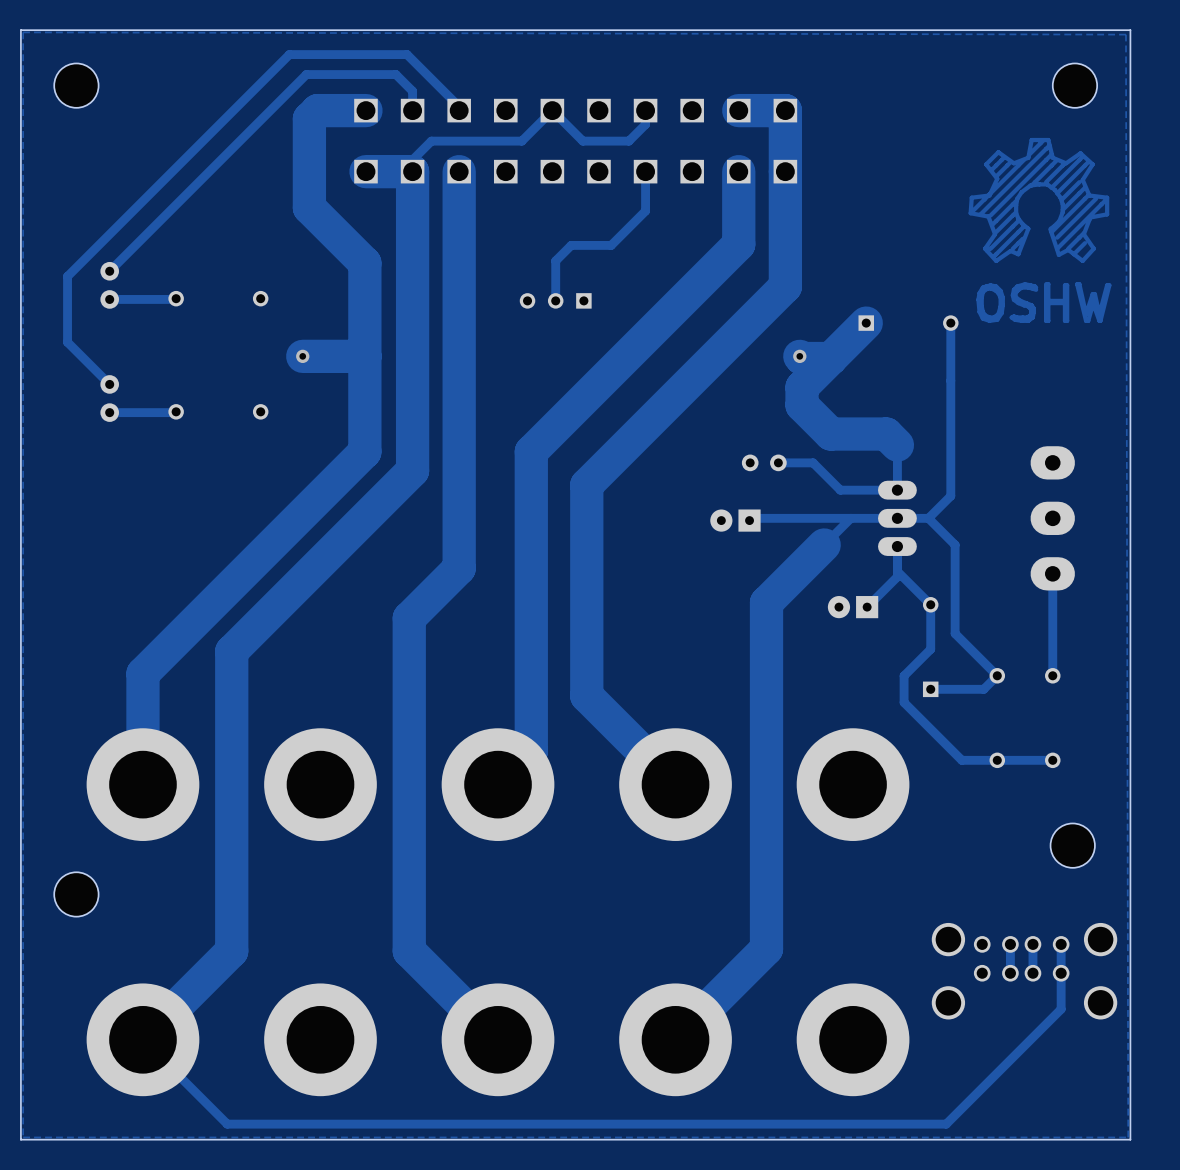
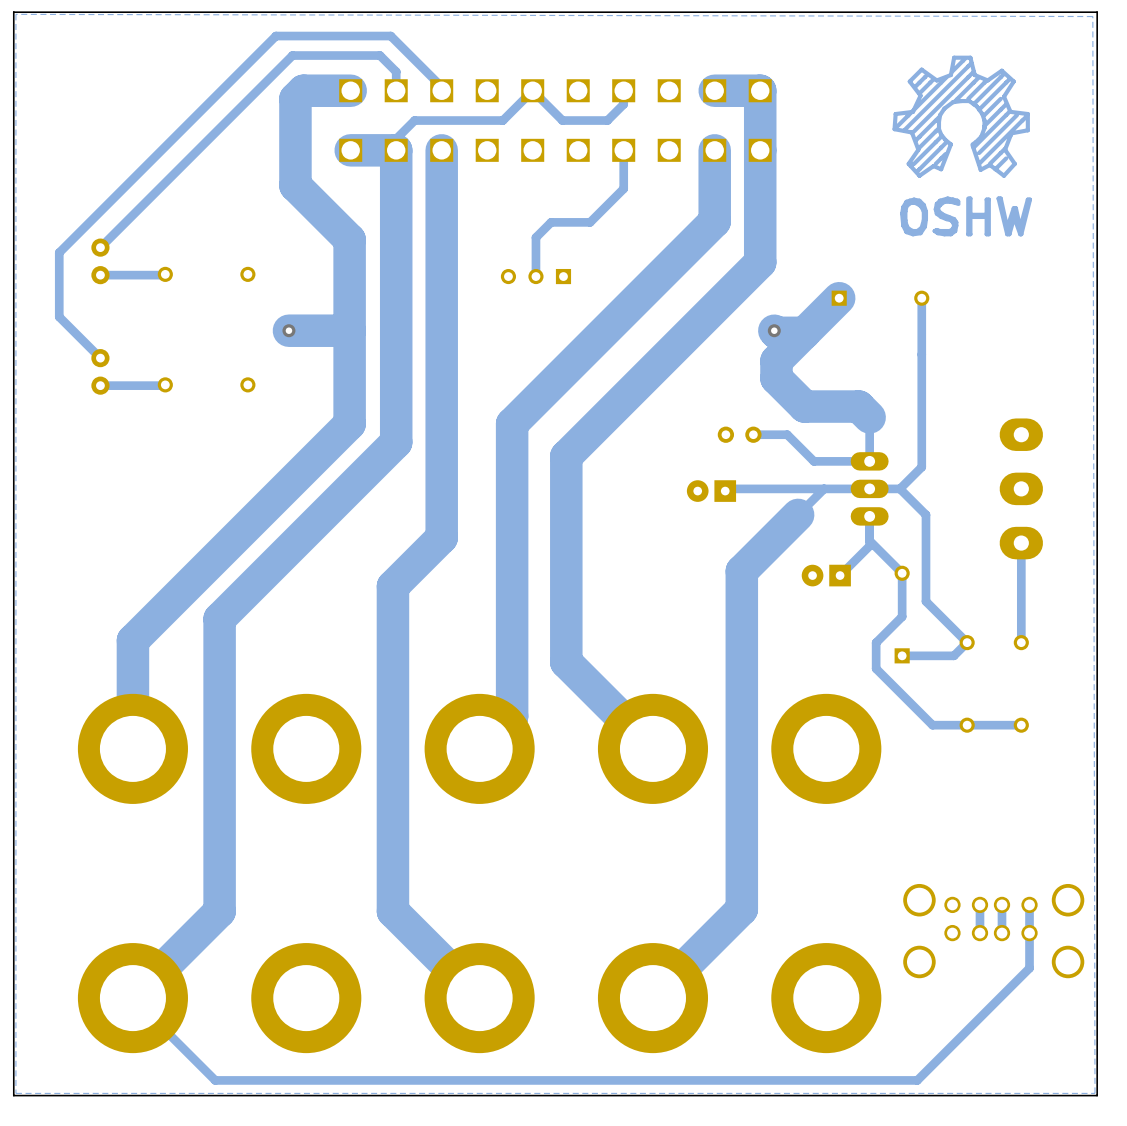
part: (76, 85) -> none
part: (1074, 85) -> none
drawing position: (1040, 230) -> (962, 145)
part: (1072, 845) -> none
part: (76, 894) -> none

